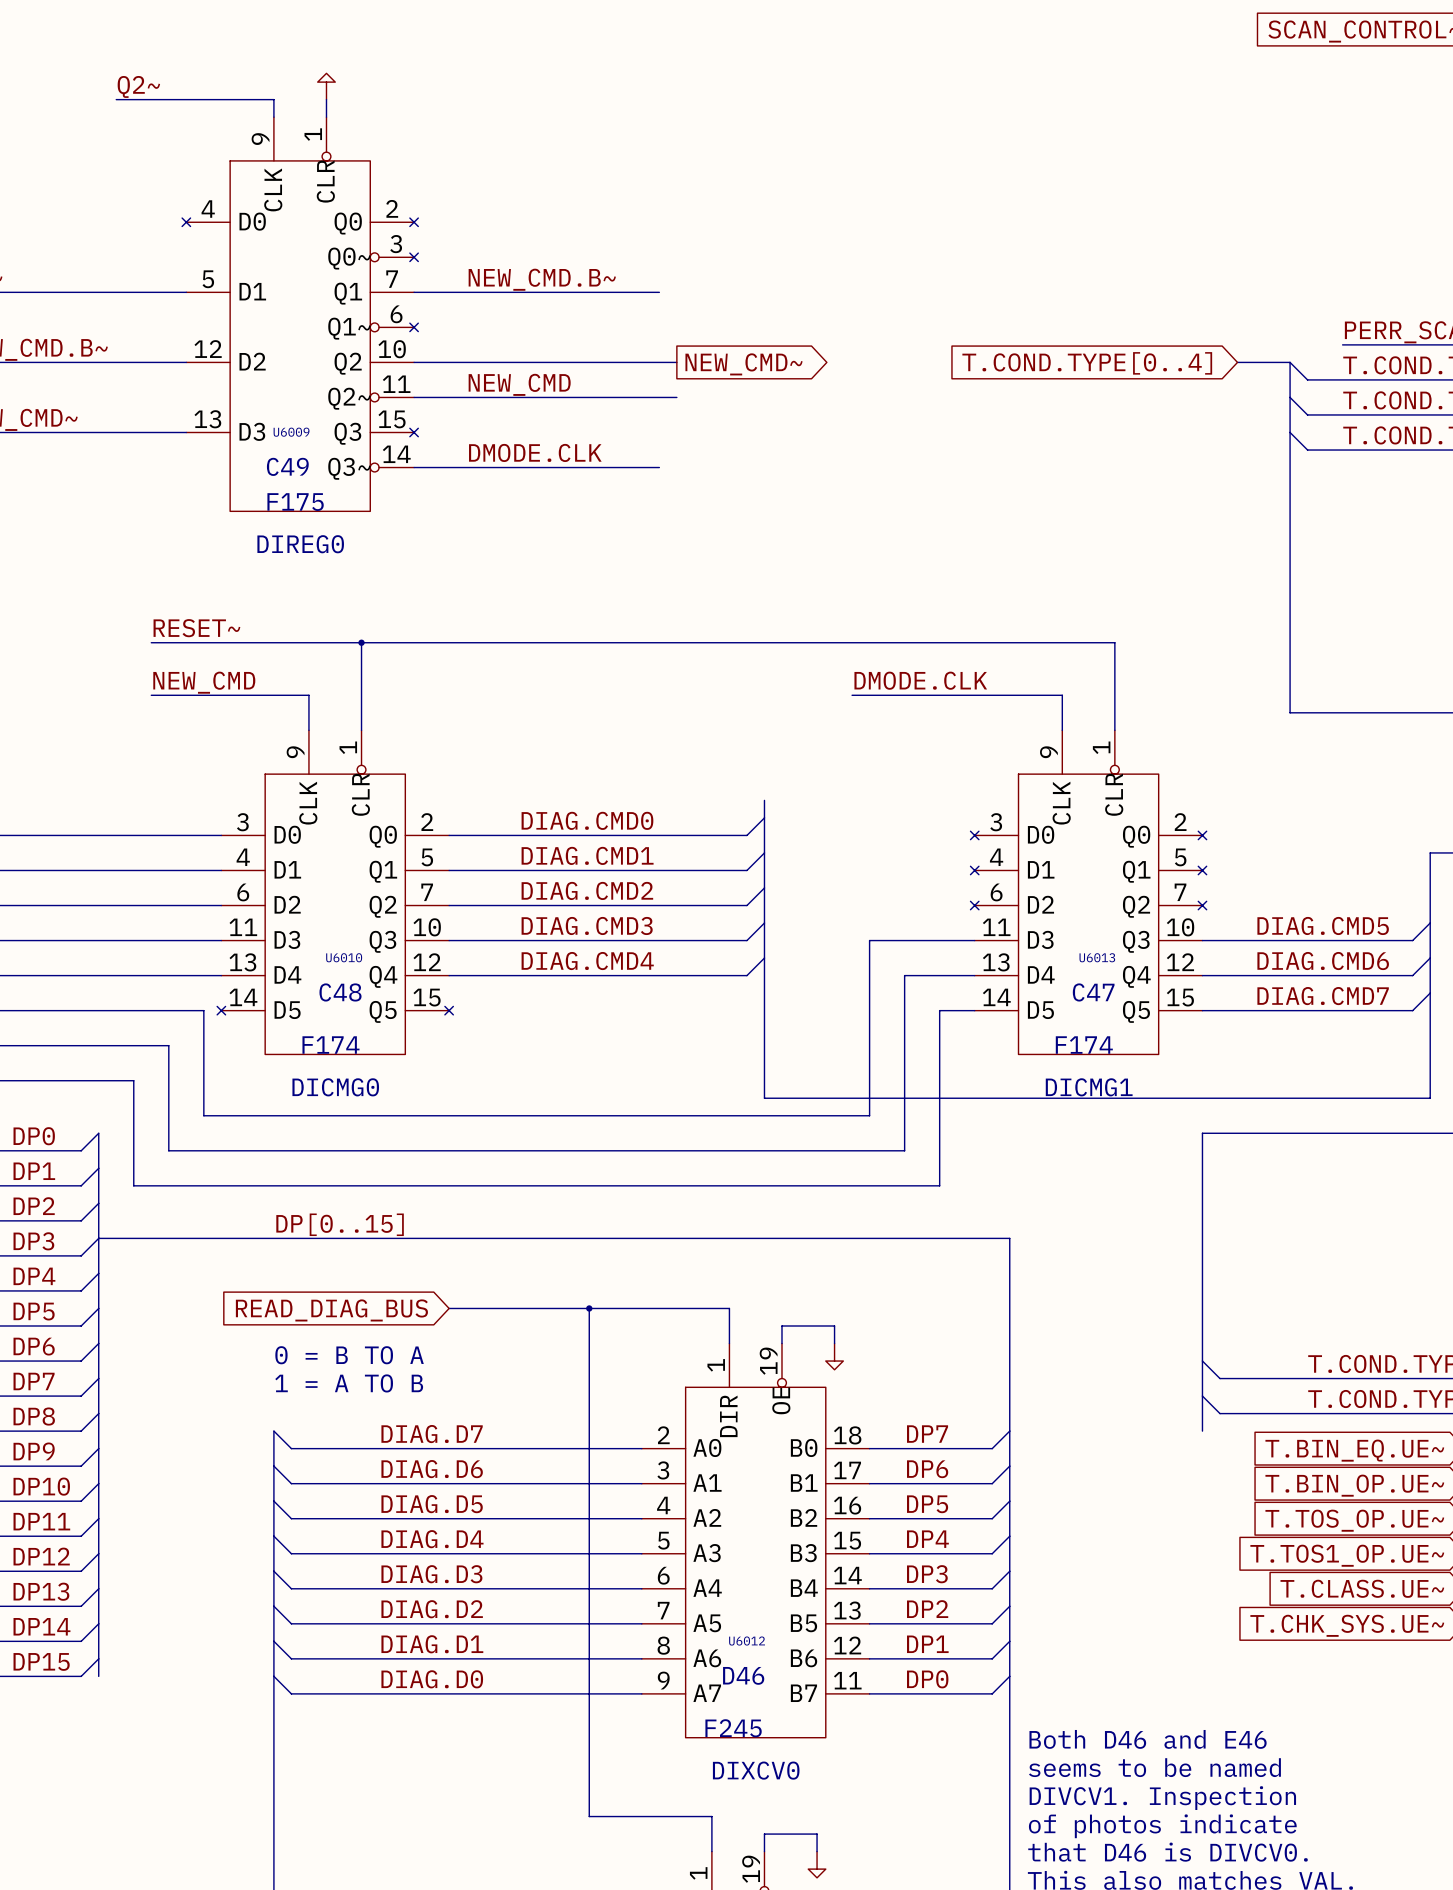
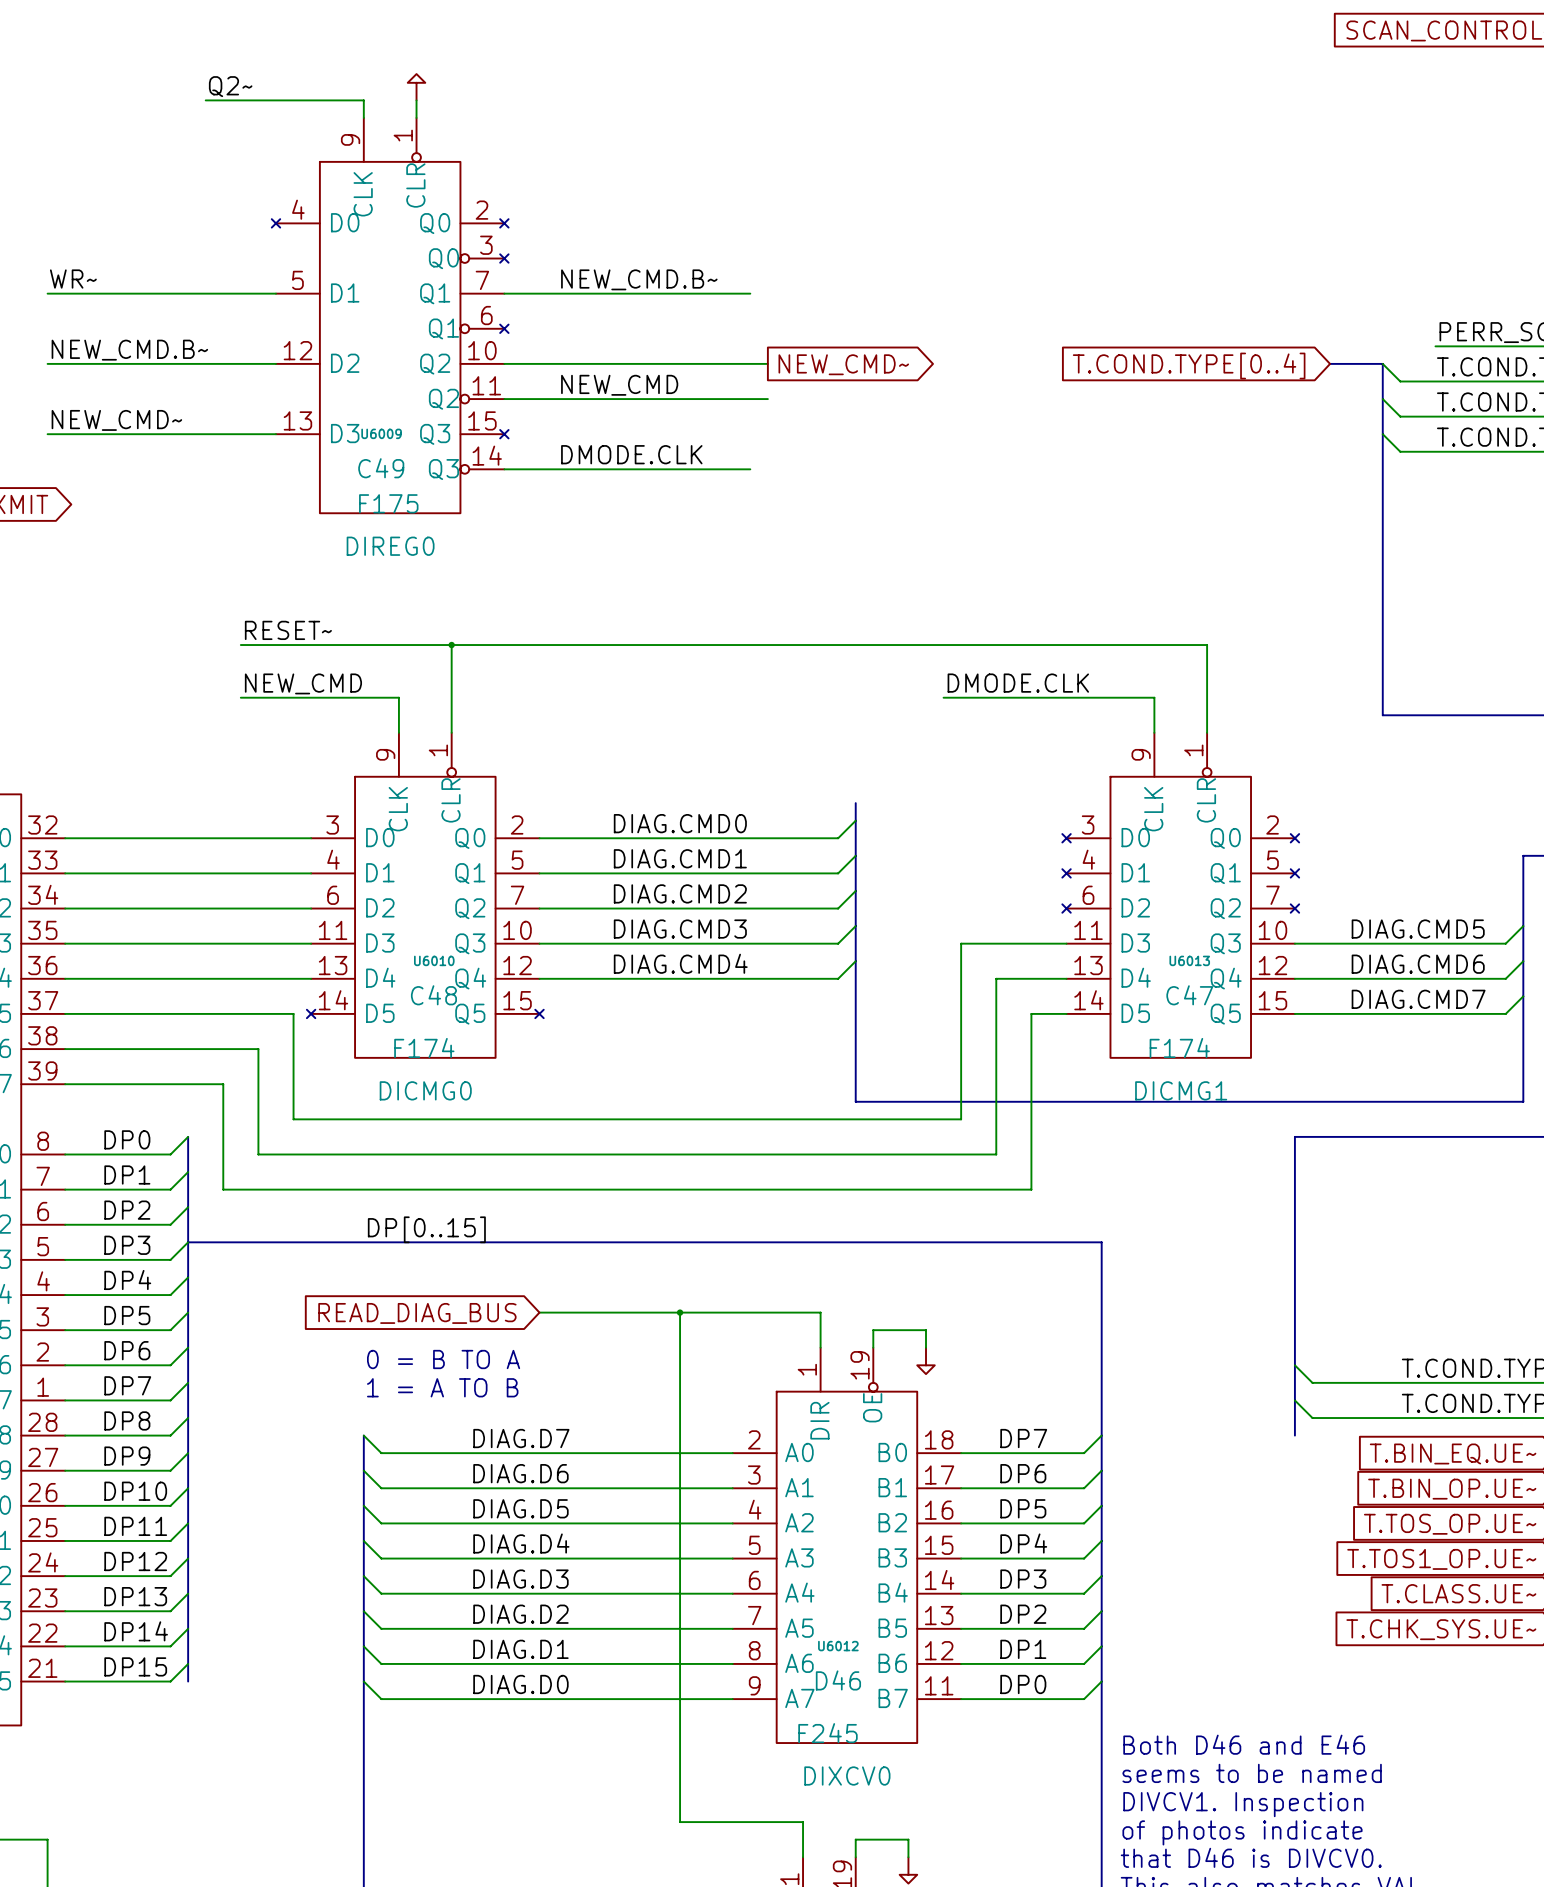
U6009 pin name: Q0~ (349, 258) -> Q0 (443, 258)
U6009 pin name: Q1~ (349, 328) -> Q1 (443, 328)
U6009 pin name: Q2~ (349, 398) -> Q2 (443, 399)
U6009 pin name: Q3~ (349, 468) -> Q3 (443, 469)

